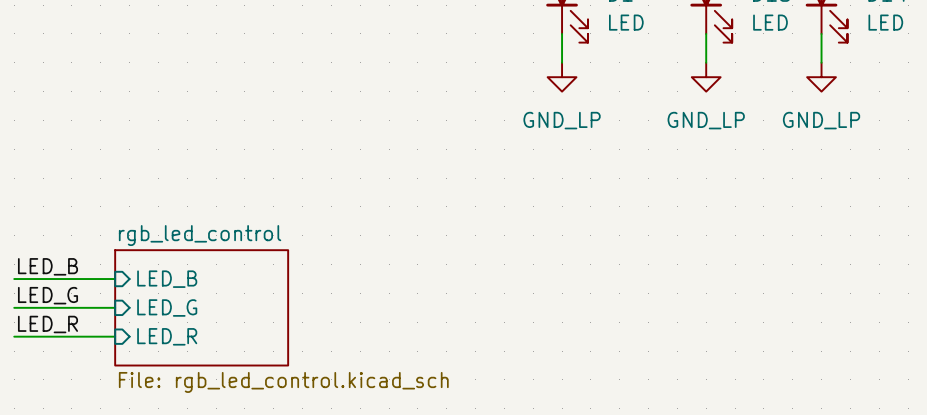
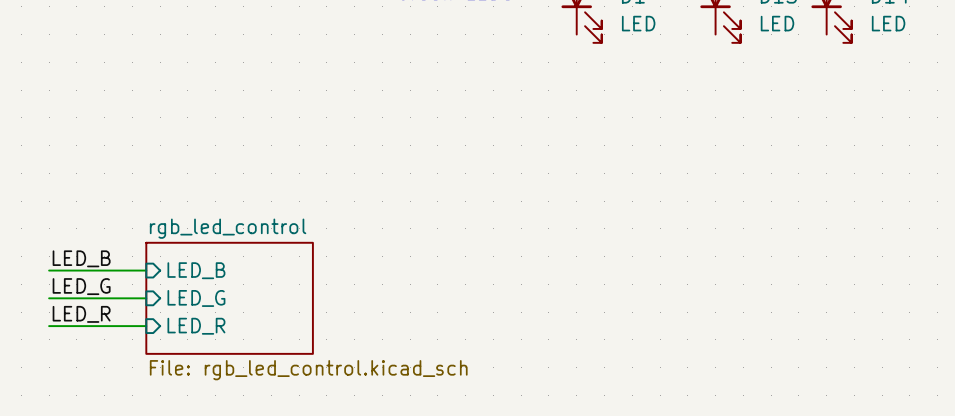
wire: (562, 33) (562, 62) -> none
wire: (706, 33) (706, 62) -> none
wire: (821, 33) (821, 62) -> none
power symbol: GND_LP (562, 77) -> none
power symbol: GND_LP (706, 77) -> none
power symbol: GND_LP (821, 77) -> none

